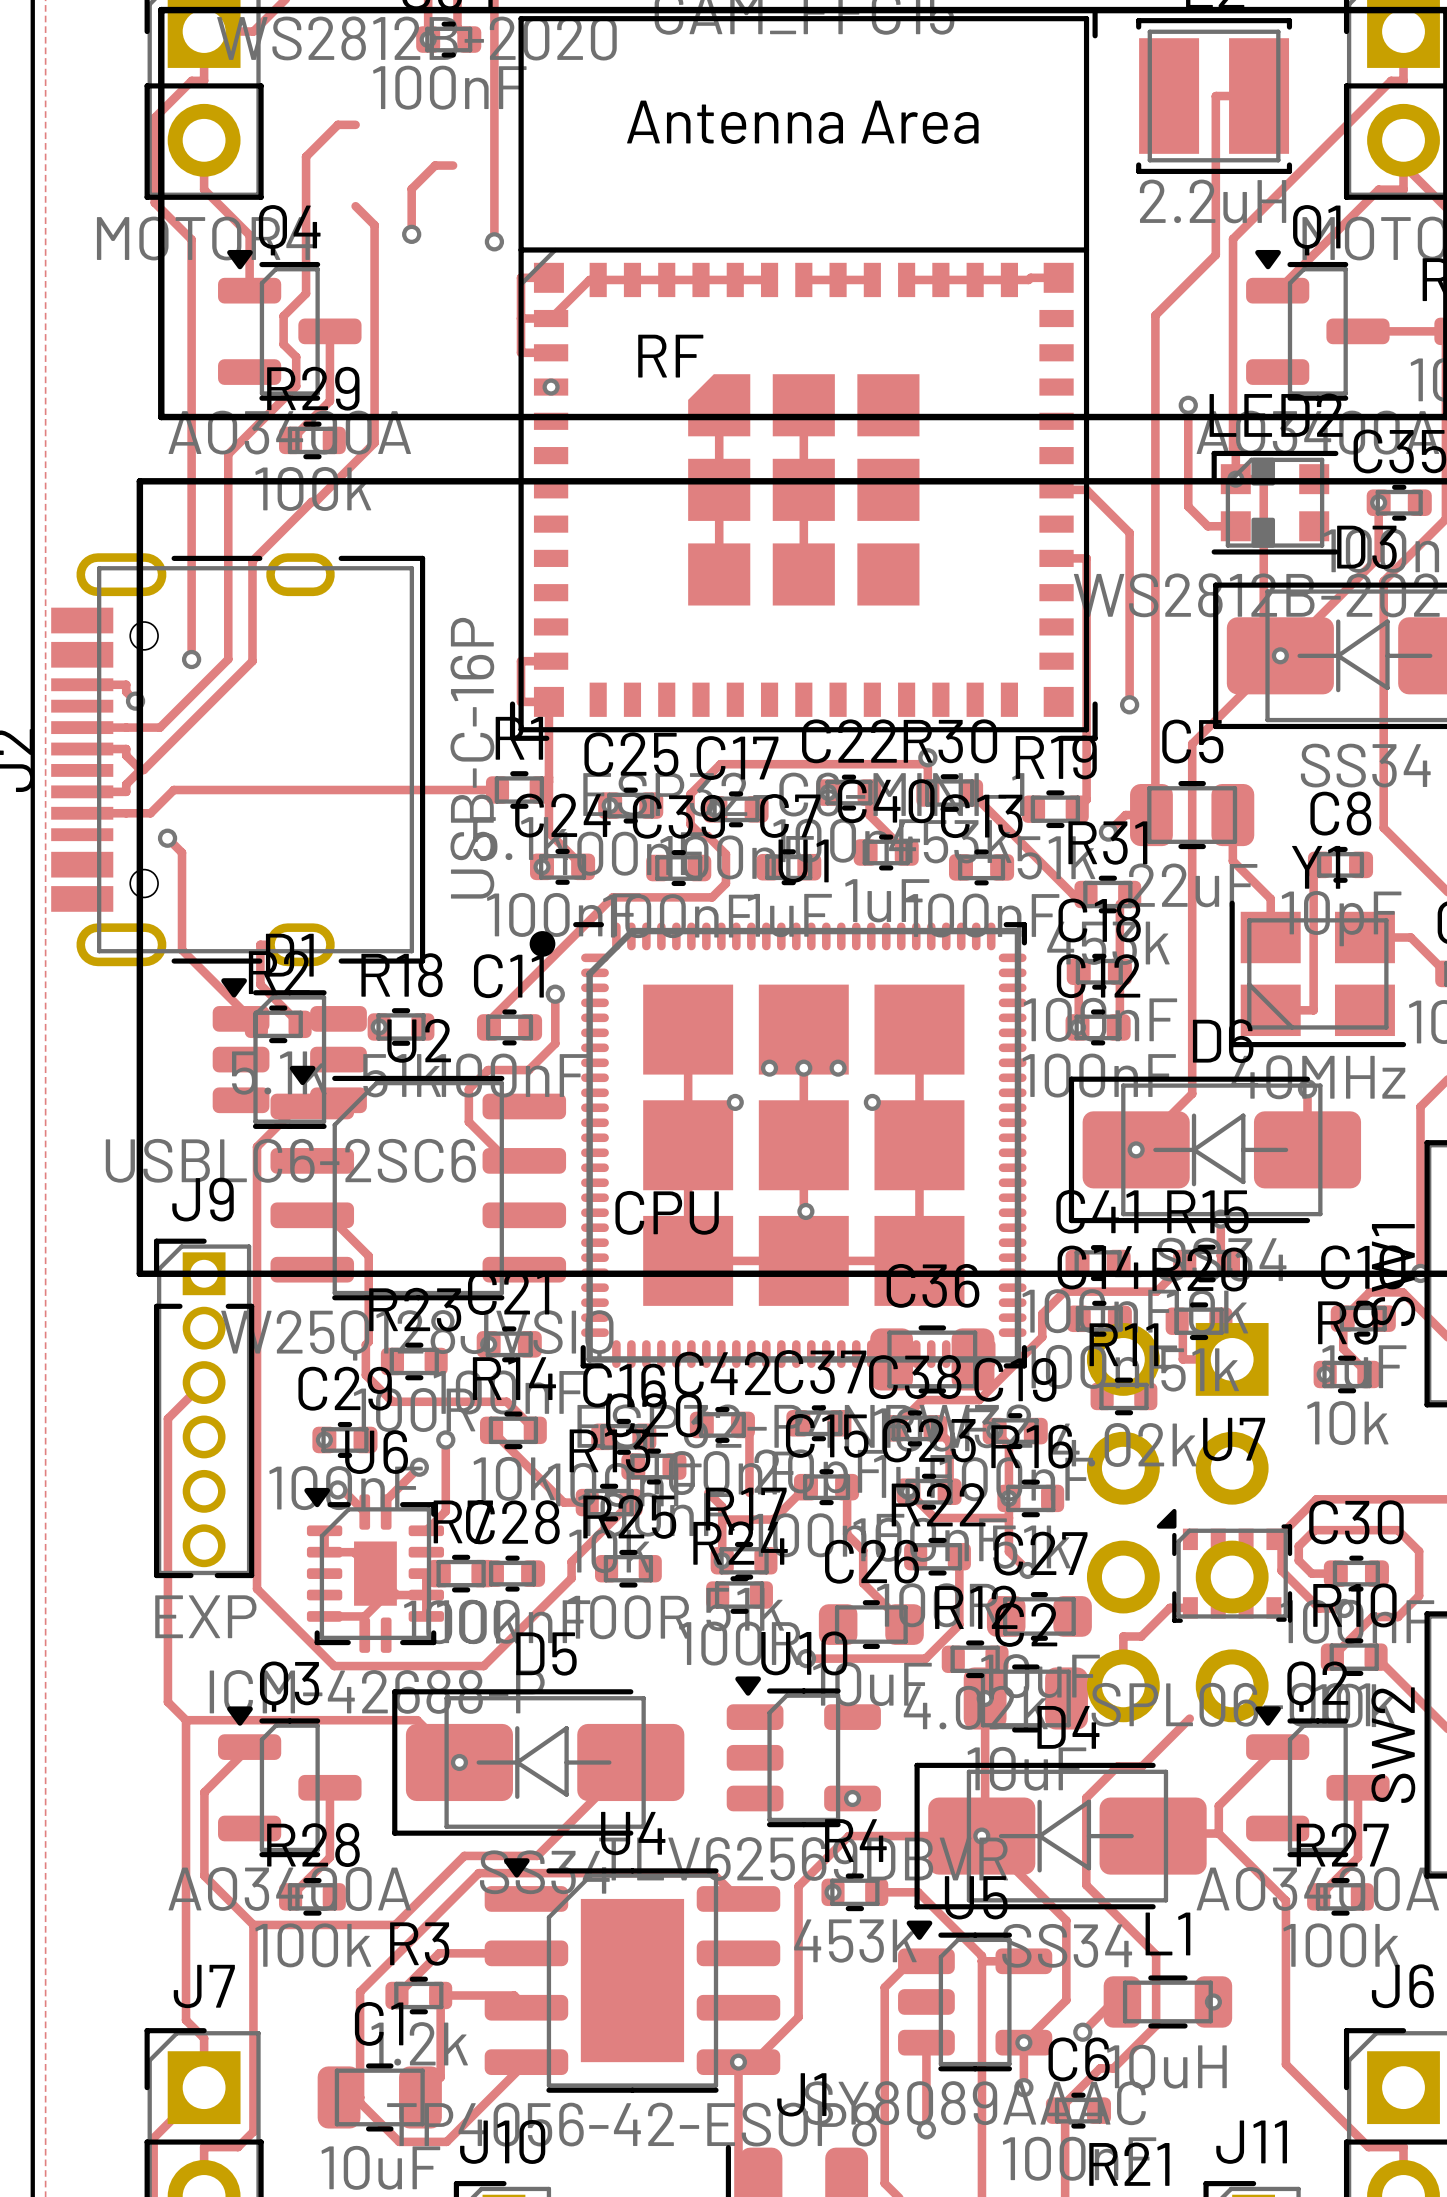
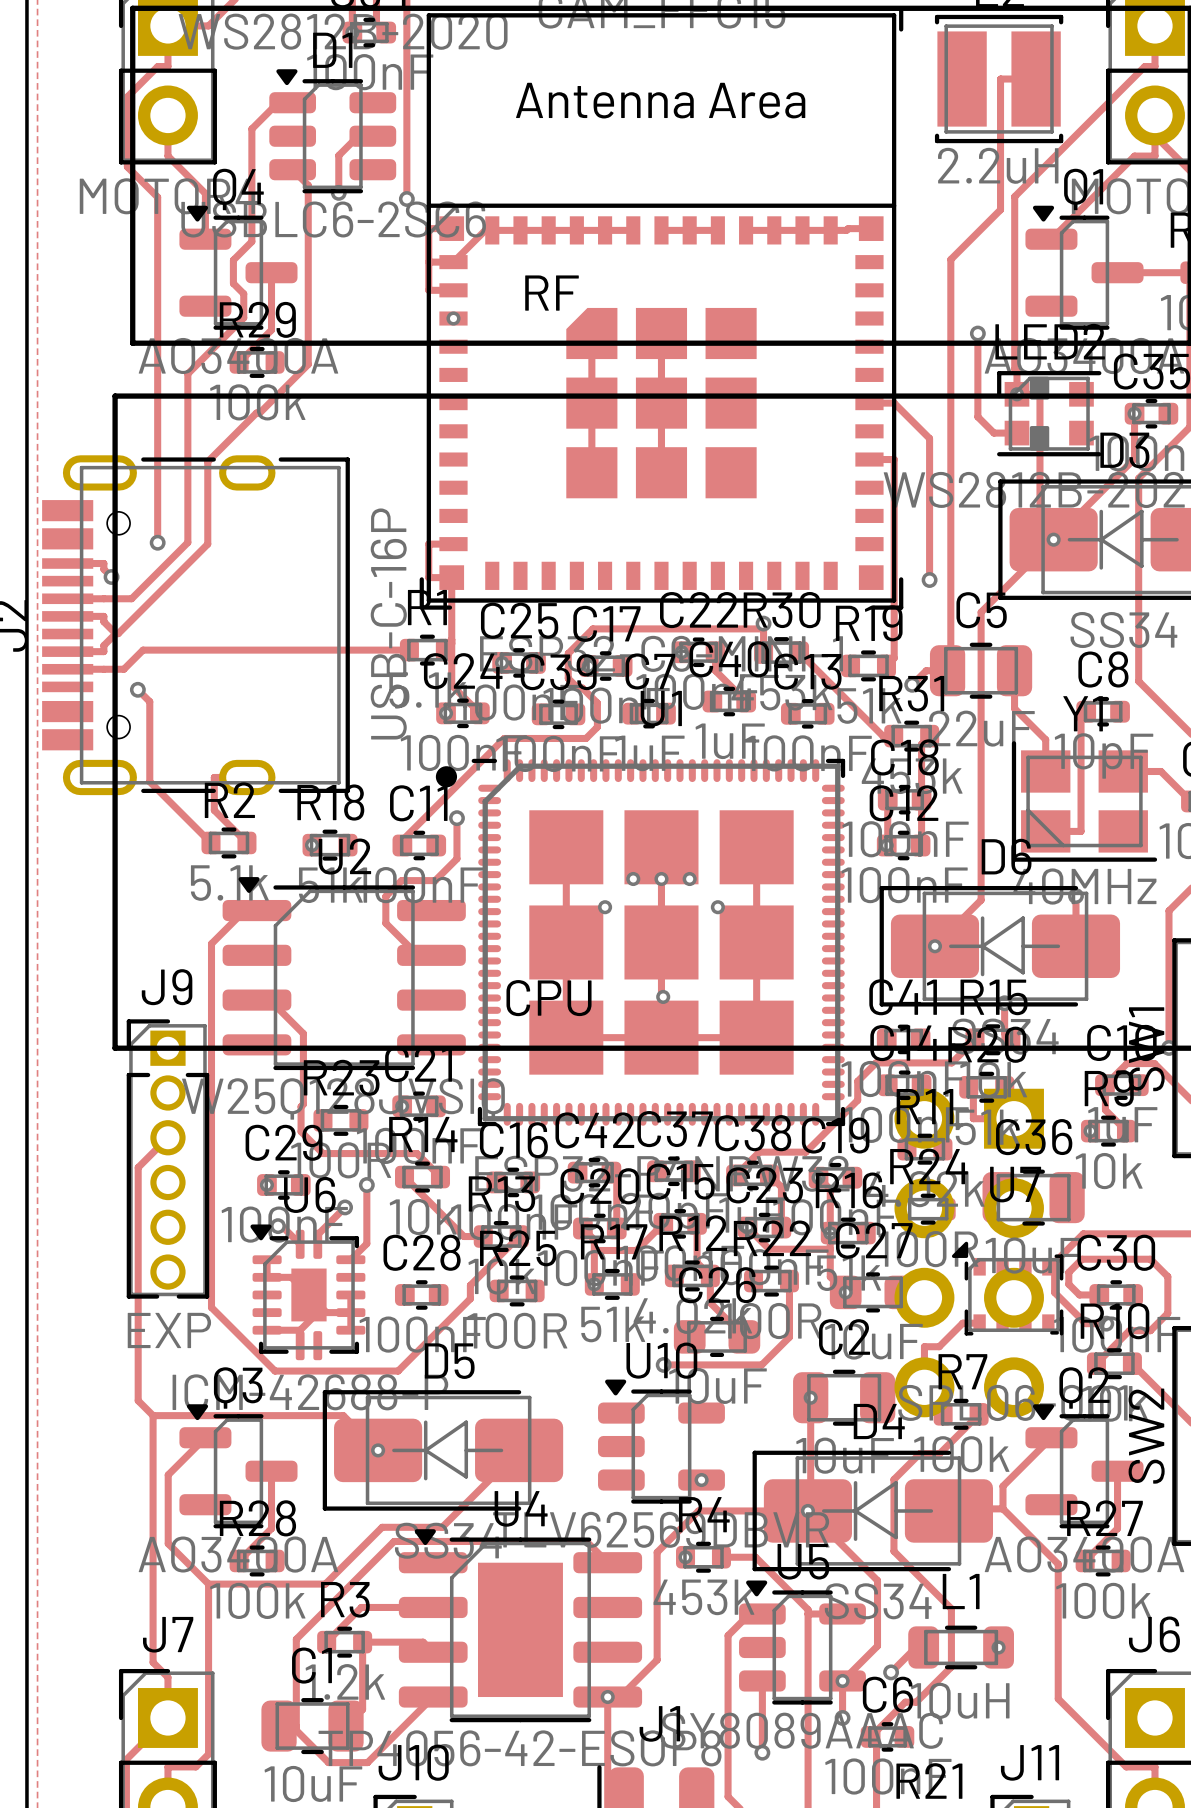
D1 position: (289, 1053) -> (332, 131)
C36 position: (932, 1359) -> (1033, 1197)
C20 position: (653, 1466) -> (599, 1228)
R7 position: (461, 1573) -> (961, 1414)
R24 position: (739, 1595) -> (928, 1209)
C27 position: (1039, 1616) -> (873, 1292)
R12 position: (975, 1659) -> (692, 1275)

